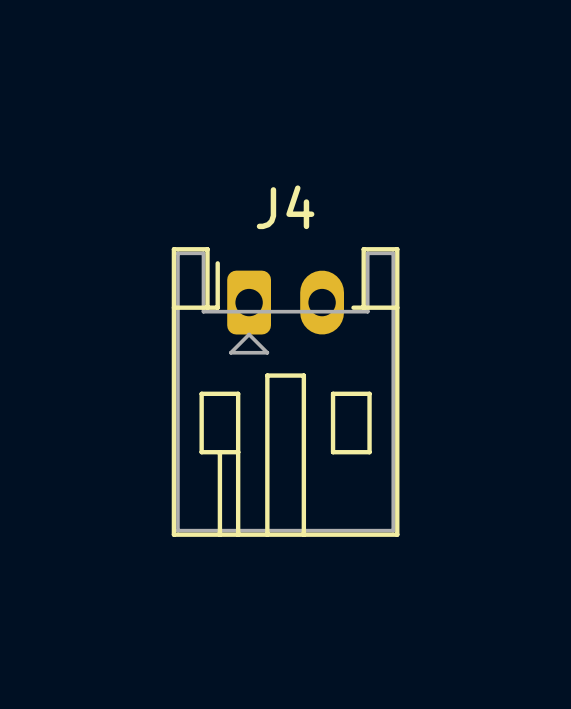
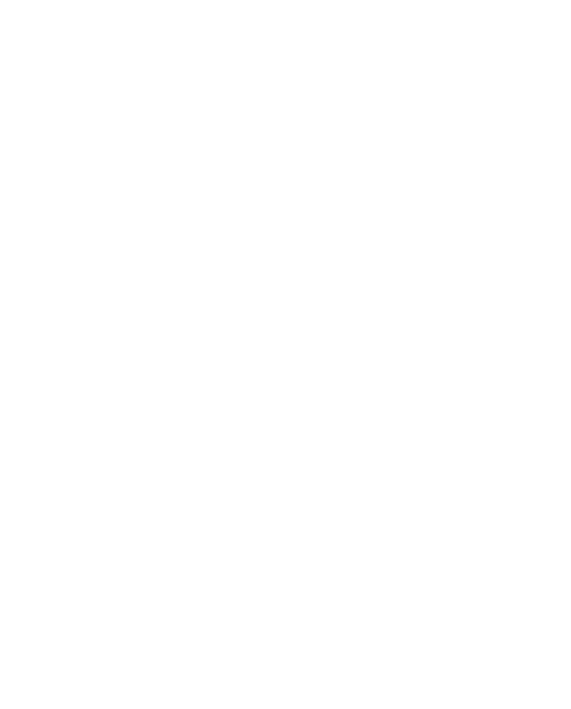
J4: (285, 391) -> none

